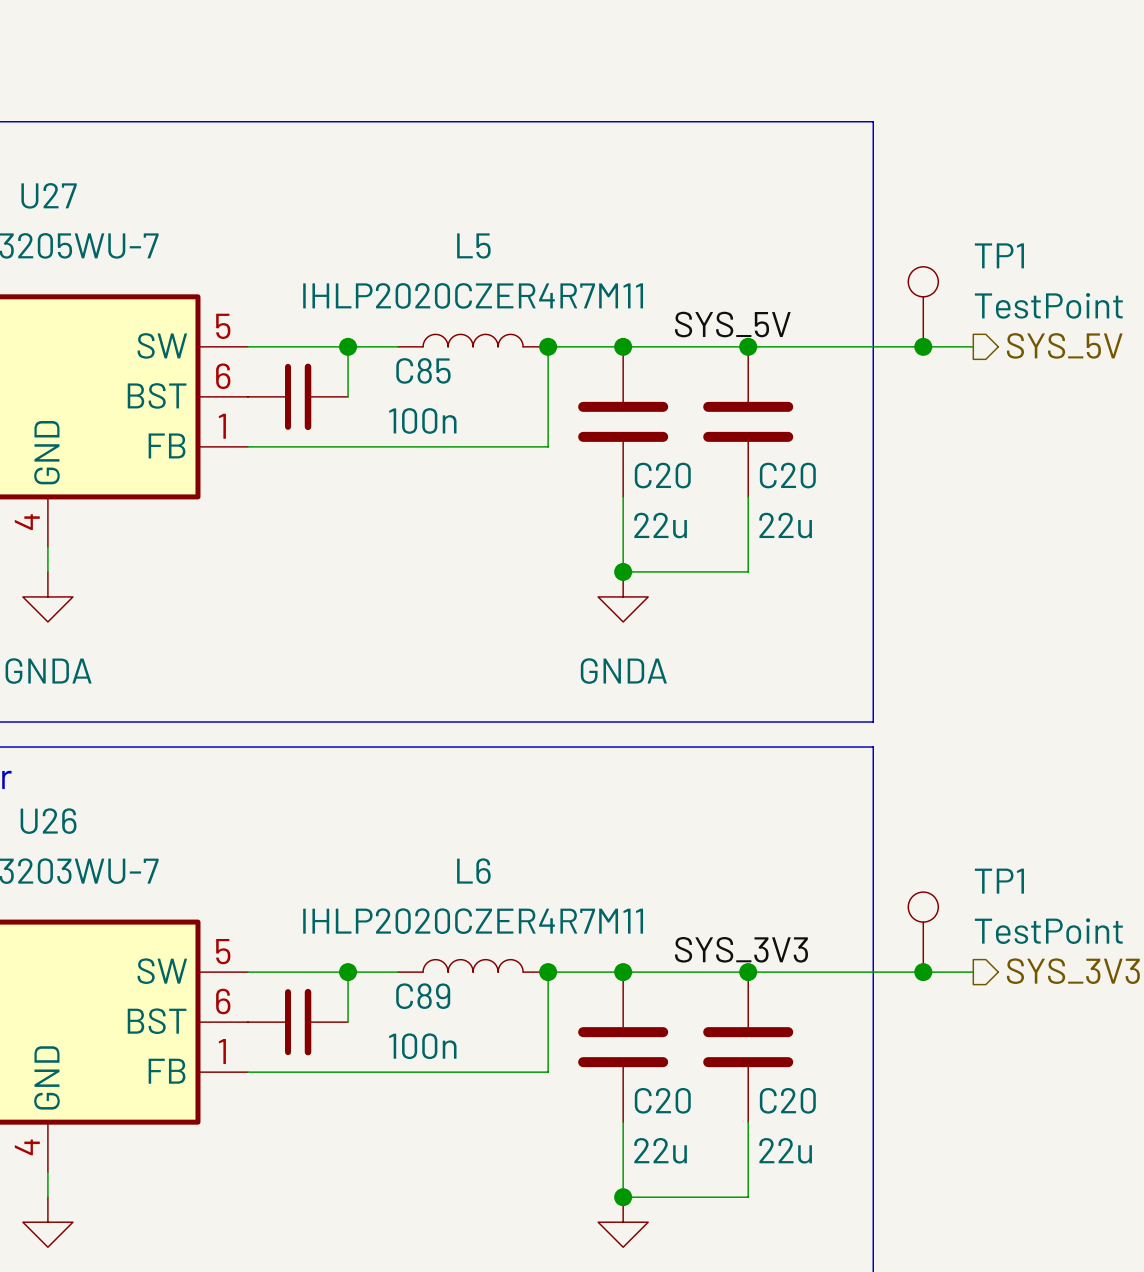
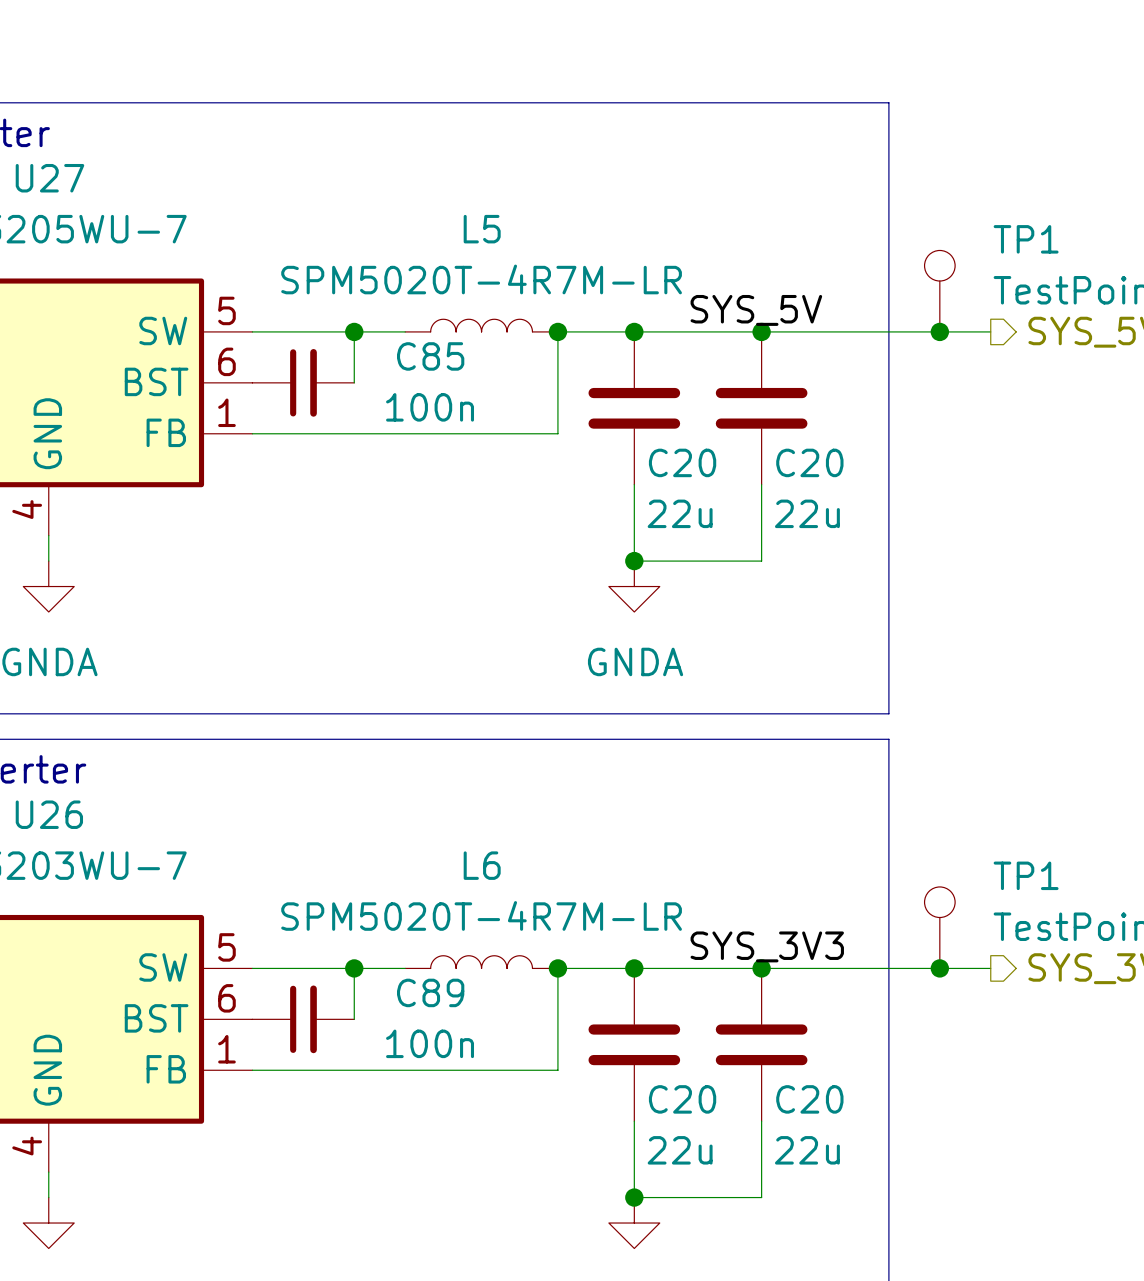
L5 value: IHLP2020CZER4R7M11 (473, 295) -> SPM5020T-4R7M-LR (481, 279)
L6 value: IHLP2020CZER4R7M11 (473, 921) -> SPM5020T-4R7M-LR (481, 915)

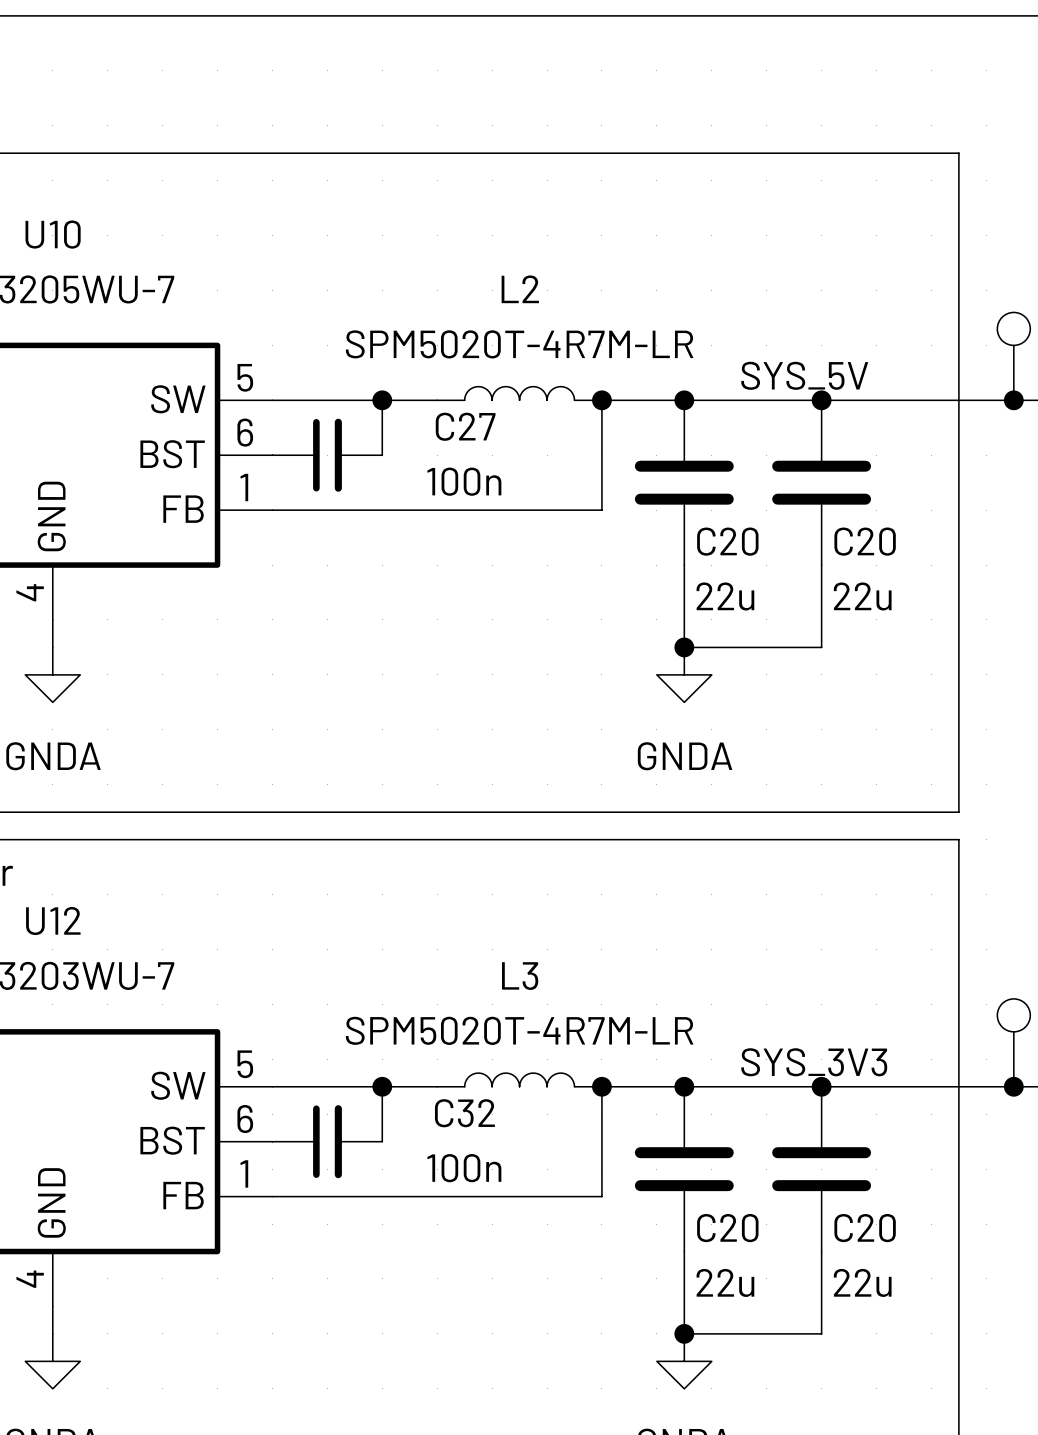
U27 name: U27 (49, 178) -> U10 (53, 234)
L5 name: L5 (482, 229) -> L2 (520, 289)
C85 name: C85 (430, 356) -> C27 (465, 426)
U26 name: U26 (49, 814) -> U12 (53, 921)
L6 name: L6 (482, 865) -> L3 (520, 976)
C89 name: C89 (430, 992) -> C32 (464, 1113)

